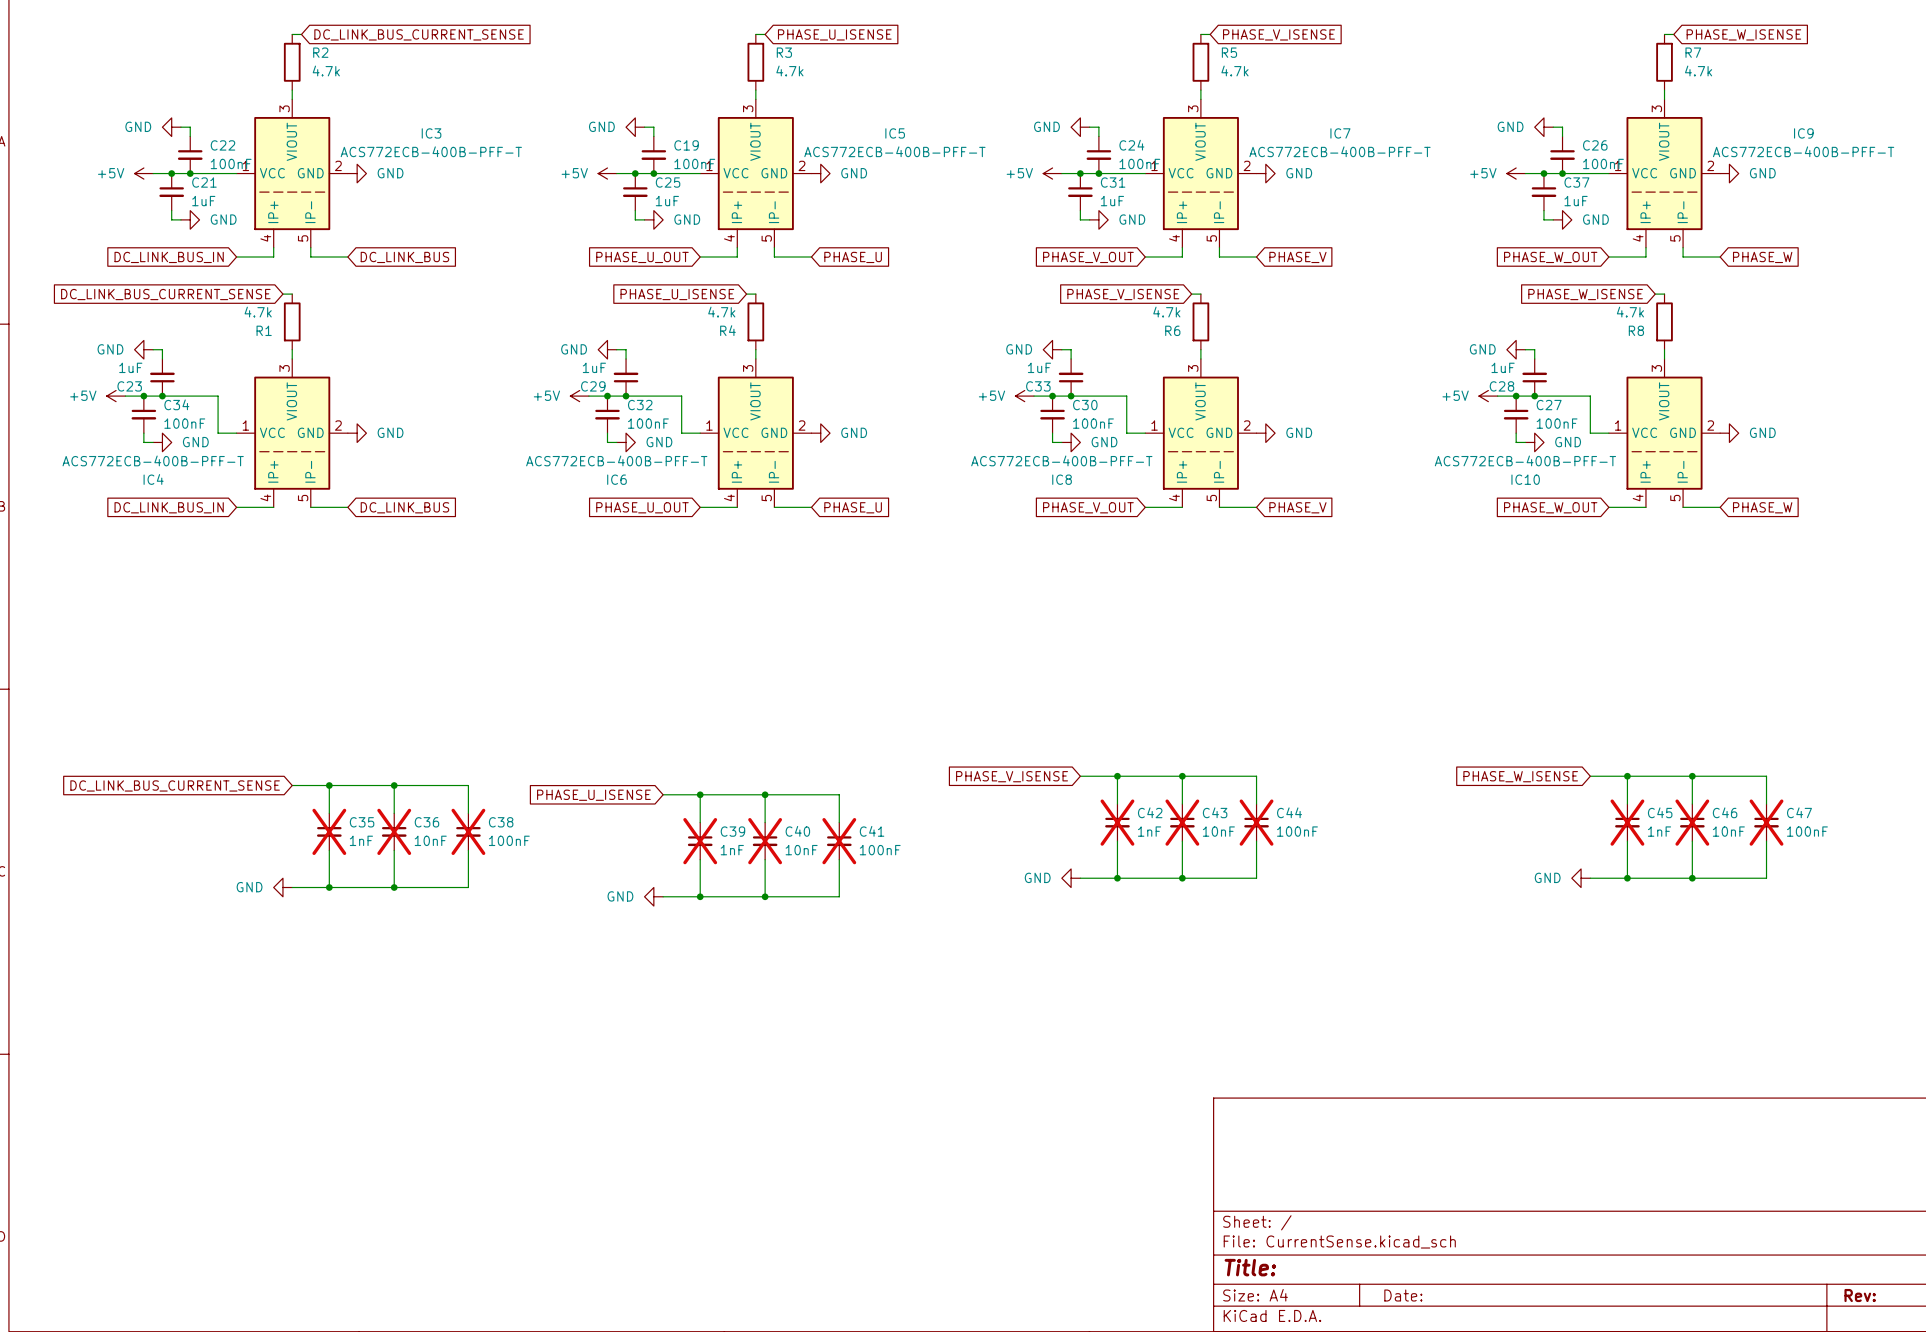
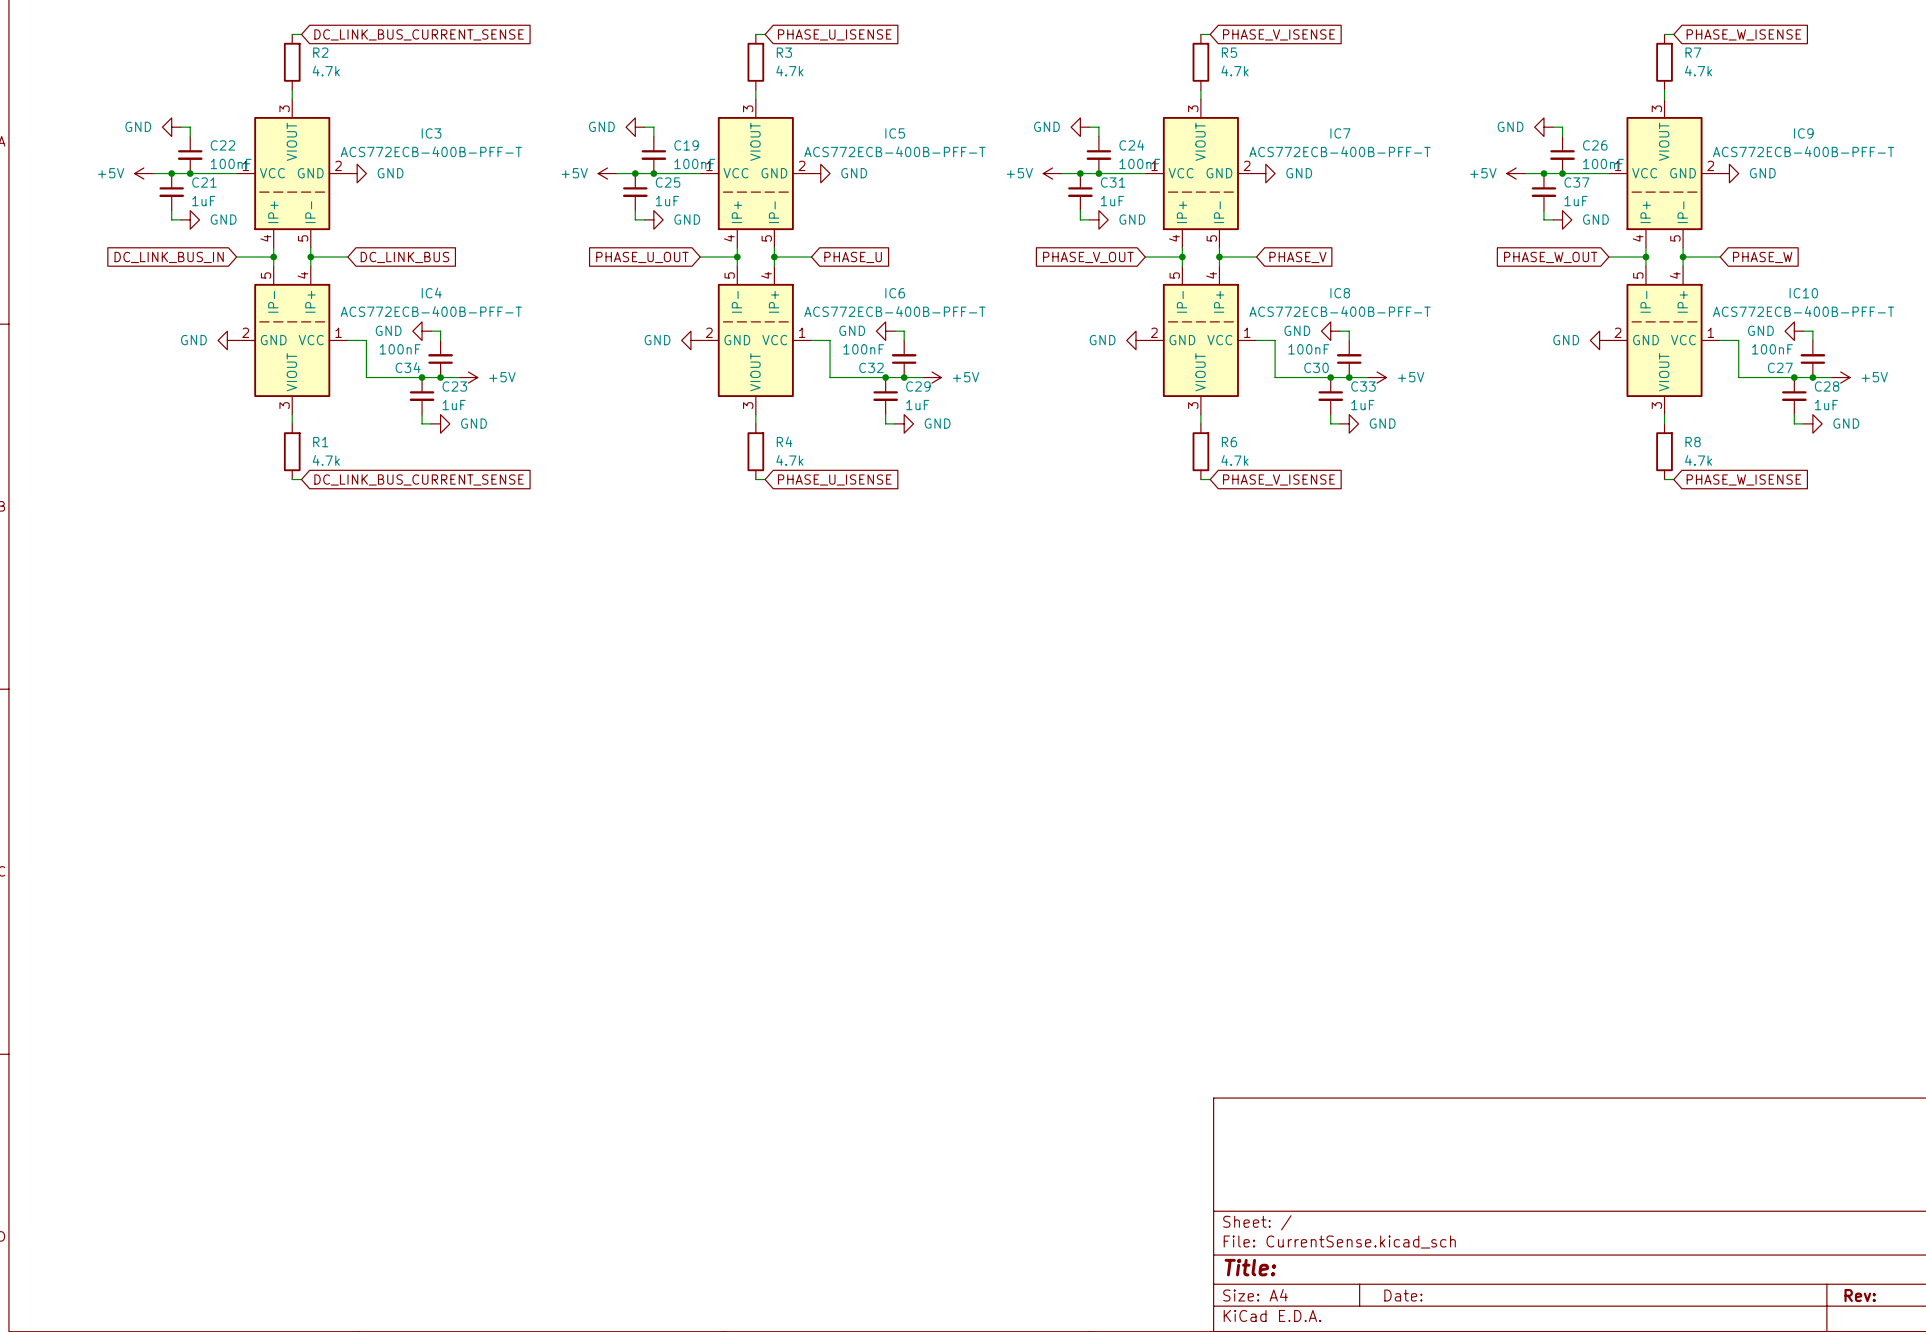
wire: none -> (273, 257) (273, 266)
junction: none -> (273, 257)
wire: none -> (310, 257) (310, 266)
junction: none -> (310, 257)
wire: none -> (737, 257) (737, 266)
junction: none -> (737, 257)
wire: none -> (774, 257) (774, 266)
junction: none -> (774, 257)
wire: none -> (1182, 257) (1182, 266)
junction: none -> (1182, 257)
wire: none -> (1219, 257) (1219, 266)
junction: none -> (1219, 257)
wire: none -> (1645, 257) (1645, 266)
junction: none -> (1645, 257)
wire: none -> (1683, 257) (1683, 266)
junction: none -> (1683, 257)
global label: DC_LINK_BUS_CURRENT_SENSE (165, 294) -> none
global label: PHASE_U_ISENSE (677, 294) -> none
global label: PHASE_V_ISENSE (1123, 294) -> none
global label: PHASE_W_ISENSE (1585, 294) -> none
R1 value position: 4.7k (258, 312) -> 4.7k (326, 460)
R4 value position: 4.7k (721, 312) -> 4.7k (789, 460)
R6 value position: 4.7k (1166, 312) -> 4.7k (1234, 460)
R8 value position: 4.7k (1630, 312) -> 4.7k (1698, 460)
R1 position: (292, 321) -> (292, 451)
R4 position: (755, 321) -> (755, 451)
R6 position: (1200, 321) -> (1200, 451)
R8 position: (1664, 321) -> (1664, 451)
R1 name position: R1 (264, 330) -> R1 (320, 442)
R4 name position: R4 (727, 330) -> R4 (784, 441)
R6 name position: R6 (1172, 330) -> R6 (1229, 442)
R8 name position: R8 (1636, 330) -> R8 (1693, 442)
power symbol: none -> GND (422, 331)
wire: none -> (431, 331) (440, 331) (440, 340)
power symbol: none -> GND (885, 331)
power symbol: none -> GND (1330, 331)
wire: none -> (1339, 331) (1349, 331) (1349, 340)
power symbol: none -> GND (1794, 331)
wire: none -> (1803, 331) (1812, 331) (1812, 340)
power symbol: none -> GND (227, 340)
wire: none -> (347, 340) (366, 340) (366, 377) (459, 377)
power symbol: none -> GND (690, 340)
wire: none -> (811, 340) (830, 340) (830, 377) (922, 377)
power symbol: none -> GND (1136, 340)
wire: none -> (1256, 340) (1275, 340) (1275, 377) (1367, 377)
power symbol: none -> GND (1599, 340)
wire: none -> (1720, 340) (1738, 340) (1738, 377) (1831, 377)
power symbol: GND (143, 349) -> none
wire: (153, 349) (162, 349) (162, 358) -> none
power symbol: GND (607, 349) -> none
wire: (616, 349) (626, 349) (626, 358) -> none
power symbol: GND (1052, 349) -> none
wire: (1061, 349) (1071, 349) (1071, 358) -> (894, 331) (904, 331) (904, 340)
power symbol: GND (1516, 349) -> none
wire: (1525, 349) (1534, 349) (1534, 358) -> none
C23 rotation: 0° (162, 377) -> 180° (422, 396)
C23 position: (162, 377) -> (422, 396)
junction: none -> (422, 377)
junction: none -> (440, 377)
C29 rotation: 0° (626, 377) -> 180° (885, 396)
C29 position: (626, 377) -> (885, 396)
junction: none -> (885, 377)
junction: none -> (904, 377)
C33 rotation: 0° (1071, 377) -> 180° (1330, 396)
C33 position: (1071, 377) -> (1330, 396)
junction: none -> (1330, 377)
junction: none -> (1349, 377)
C28 rotation: 0° (1534, 377) -> 180° (1794, 396)
C28 position: (1534, 377) -> (1794, 396)
junction: none -> (1794, 377)
junction: none -> (1812, 377)
power symbol: none -> +5V (1840, 377)
power symbol: +5V (116, 396) -> none
wire: (125, 396) (218, 396) (218, 433) (236, 433) -> none
junction: (143, 396) -> none
junction: (162, 396) -> none
power symbol rotation: 0° (579, 396) -> 180° (468, 377)
power symbol position: +5V (579, 396) -> +5V (468, 377)
wire: (588, 396) (681, 396) (681, 433) (700, 433) -> none
junction: (607, 396) -> none
junction: (626, 396) -> none
power symbol rotation: 0° (1024, 396) -> 180° (932, 377)
power symbol position: +5V (1024, 396) -> +5V (932, 377)
wire: (1034, 396) (1126, 396) (1126, 433) (1145, 433) -> none
junction: (1052, 396) -> none
junction: (1071, 396) -> none
power symbol rotation: 0° (1488, 396) -> 180° (1377, 377)
power symbol position: +5V (1488, 396) -> +5V (1377, 377)
wire: (1497, 396) (1590, 396) (1590, 433) (1608, 433) -> none
junction: (1516, 396) -> none
junction: (1534, 396) -> none
C34 rotation: 0° (143, 414) -> 180° (440, 358)
C34 position: (143, 414) -> (440, 358)
wire: none -> (422, 414) (422, 423) (431, 423)
C32 rotation: 0° (607, 414) -> 180° (904, 358)
C32 position: (607, 414) -> (904, 358)
C30 rotation: 0° (1052, 414) -> 180° (1349, 358)
C30 position: (1052, 414) -> (1349, 358)
wire: none -> (1330, 414) (1330, 423) (1339, 423)
C27 rotation: 0° (1516, 414) -> 180° (1812, 358)
C27 position: (1516, 414) -> (1812, 358)
wire: none -> (1794, 414) (1794, 423) (1803, 423)
power symbol: none -> GND (440, 423)
power symbol: none -> GND (904, 423)
power symbol: none -> GND (1349, 423)
power symbol: none -> GND (1812, 423)
wire: (143, 433) (143, 442) (153, 442) -> none
IC4 rotation: 0° (292, 433) -> 180° (292, 340)
IC4 position: (292, 433) -> (292, 340)
power symbol: GND (357, 433) -> none
wire: (607, 433) (607, 442) (616, 442) -> none
IC6 rotation: 0° (755, 433) -> 180° (755, 340)
IC6 position: (755, 433) -> (755, 340)
power symbol: GND (820, 433) -> none
wire: (1052, 433) (1052, 442) (1061, 442) -> (885, 414) (885, 423) (894, 423)
IC8 rotation: 0° (1200, 433) -> 180° (1200, 340)
IC8 position: (1200, 433) -> (1200, 340)
power symbol: GND (1265, 433) -> none
wire: (1516, 433) (1516, 442) (1525, 442) -> none
IC10 rotation: 0° (1664, 433) -> 180° (1664, 340)
IC10 position: (1664, 433) -> (1664, 340)
power symbol: GND (1729, 433) -> none
power symbol: GND (162, 442) -> none
power symbol: GND (626, 442) -> none
power symbol: GND (1071, 442) -> none
power symbol: GND (1534, 442) -> none
global label: none -> DC_LINK_BUS_CURRENT_SENSE (419, 479)
global label: none -> PHASE_U_ISENSE (834, 479)
global label: none -> PHASE_V_ISENSE (1278, 479)
global label: none -> PHASE_W_ISENSE (1743, 479)
global label: DC_LINK_BUS_IN (169, 507) -> none
wire: (236, 507) (273, 507) -> none
wire: (310, 507) (347, 507) -> none
global label: DC_LINK_BUS (404, 507) -> none
global label: PHASE_U_OUT (642, 507) -> none
wire: (700, 507) (737, 507) -> none
wire: (774, 507) (811, 507) -> none
global label: PHASE_U (853, 507) -> none
global label: PHASE_V_OUT (1088, 507) -> none
wire: (1145, 507) (1182, 507) -> none
wire: (1219, 507) (1256, 507) -> none
global label: PHASE_V (1297, 507) -> none
global label: PHASE_W_OUT (1550, 507) -> none
wire: (1608, 507) (1645, 507) -> none
wire: (1683, 507) (1720, 507) -> none
global label: PHASE_W (1762, 507) -> none
global label: PHASE_V_ISENSE (1012, 776) -> none
wire: (1080, 776) (1256, 776) (1256, 804) -> none
wire: (1117, 776) (1117, 804) -> none
junction: (1117, 776) -> none
wire: (1182, 776) (1182, 804) -> none
junction: (1182, 776) -> none
global label: PHASE_W_ISENSE (1520, 776) -> none
wire: (1590, 776) (1766, 776) (1766, 804) -> none
wire: (1627, 776) (1627, 804) -> none
junction: (1627, 776) -> none
wire: (1692, 776) (1692, 804) -> none
junction: (1692, 776) -> none
global label: DC_LINK_BUS_CURRENT_SENSE (175, 785) -> none
wire: (292, 785) (468, 785) (468, 813) -> none
wire: (329, 785) (329, 813) -> none
junction: (329, 785) -> none
wire: (394, 785) (394, 813) -> none
junction: (394, 785) -> none
wire: (663, 794) (839, 794) (839, 822) -> none
wire: (700, 794) (700, 822) -> none
junction: (700, 794) -> none
wire: (765, 794) (765, 822) -> none
junction: (765, 794) -> none
global label: PHASE_U_ISENSE (593, 795) -> none
C42: 1nF (1117, 822) -> none
C43: 10nF (1182, 822) -> none
C44: 100nF (1256, 822) -> none
C45: 1nF (1627, 822) -> none
C46: 10nF (1692, 822) -> none
C47: 100nF (1766, 822) -> none
C35: 1nF (329, 831) -> none
C36: 10nF (394, 831) -> none
C38: 100nF (468, 831) -> none
C39: 1nF (700, 841) -> none
C40: 10nF (765, 841) -> none
C41: 100nF (839, 841) -> none
wire: (1117, 841) (1117, 878) -> none
wire: (1182, 841) (1182, 878) -> none
wire: (1256, 841) (1256, 878) (1080, 878) -> none
wire: (1627, 841) (1627, 878) -> none
wire: (1692, 841) (1692, 878) -> none
wire: (1766, 841) (1766, 878) (1590, 878) -> none
wire: (329, 850) (329, 887) -> none
wire: (394, 850) (394, 887) -> none
wire: (468, 850) (468, 887) (292, 887) -> none
wire: (700, 859) (700, 896) -> none
wire: (765, 859) (765, 896) -> none
wire: (839, 859) (839, 896) (663, 896) -> none
power symbol: GND (1071, 878) -> none
junction: (1117, 878) -> none
junction: (1182, 878) -> none
power symbol: GND (1581, 878) -> none
junction: (1627, 878) -> none
junction: (1692, 878) -> none
power symbol: GND (282, 887) -> none
junction: (329, 887) -> none
junction: (394, 887) -> none
power symbol: GND (653, 896) -> none
junction: (700, 896) -> none
junction: (765, 896) -> none

